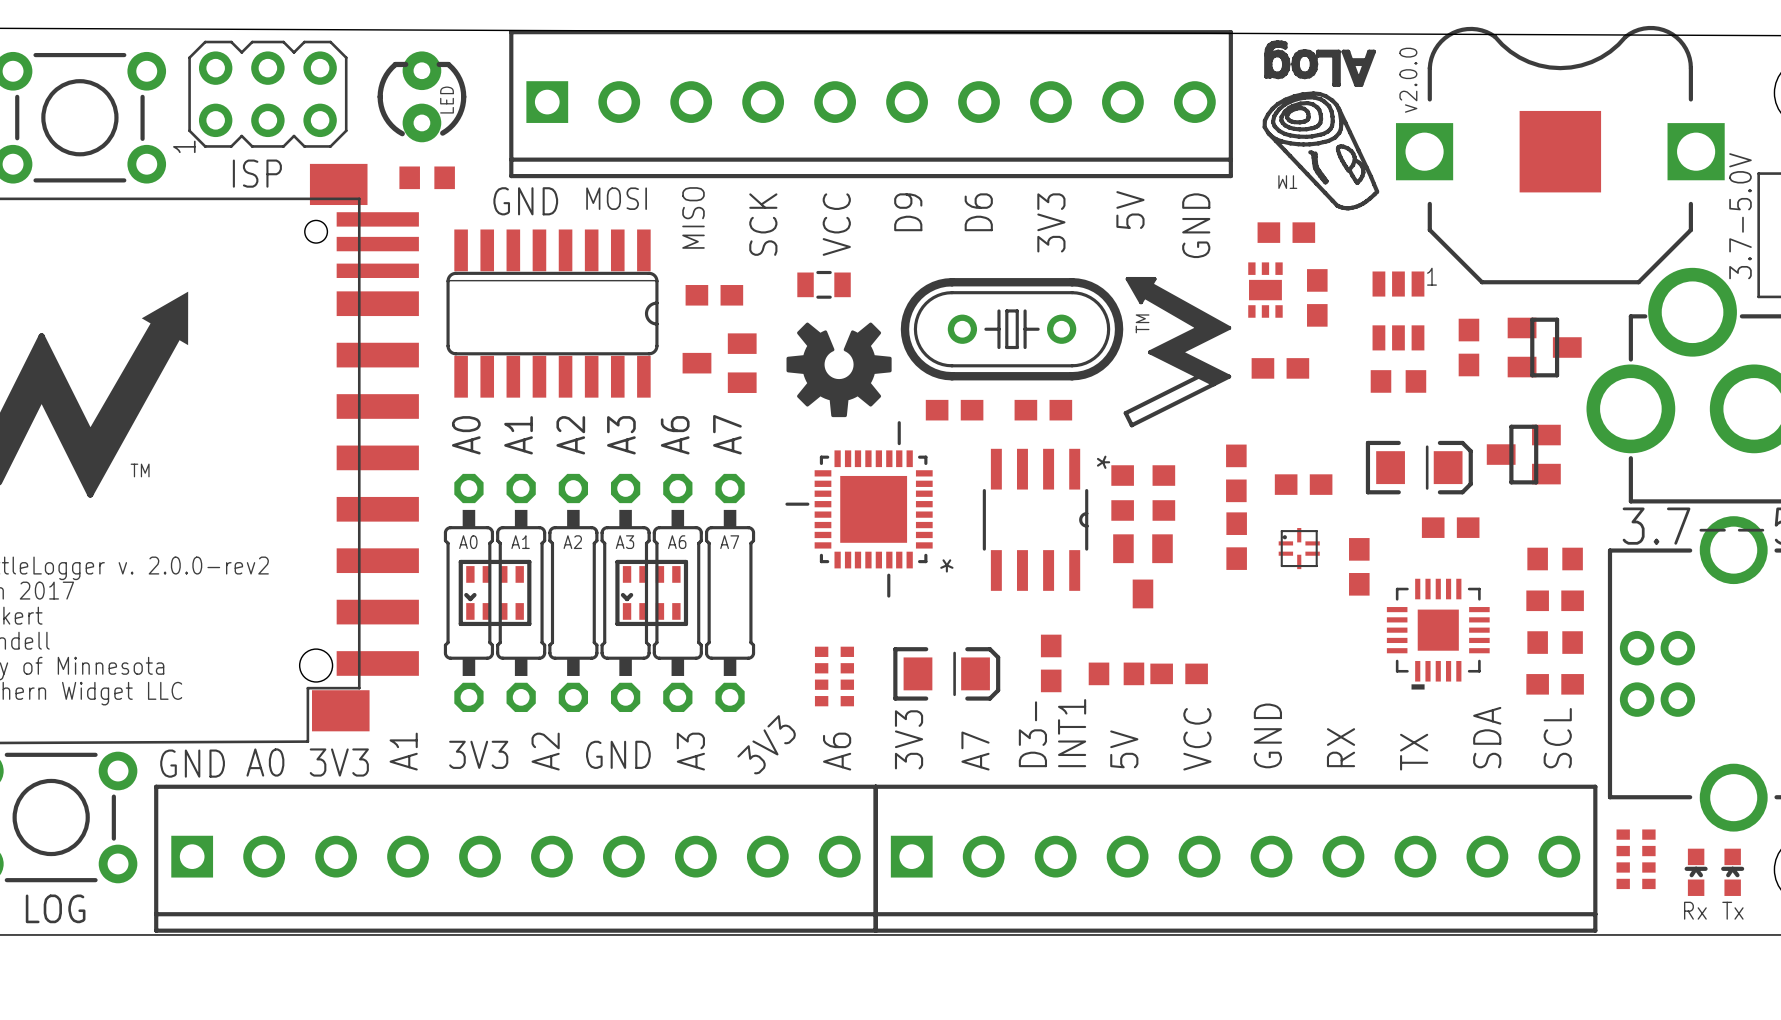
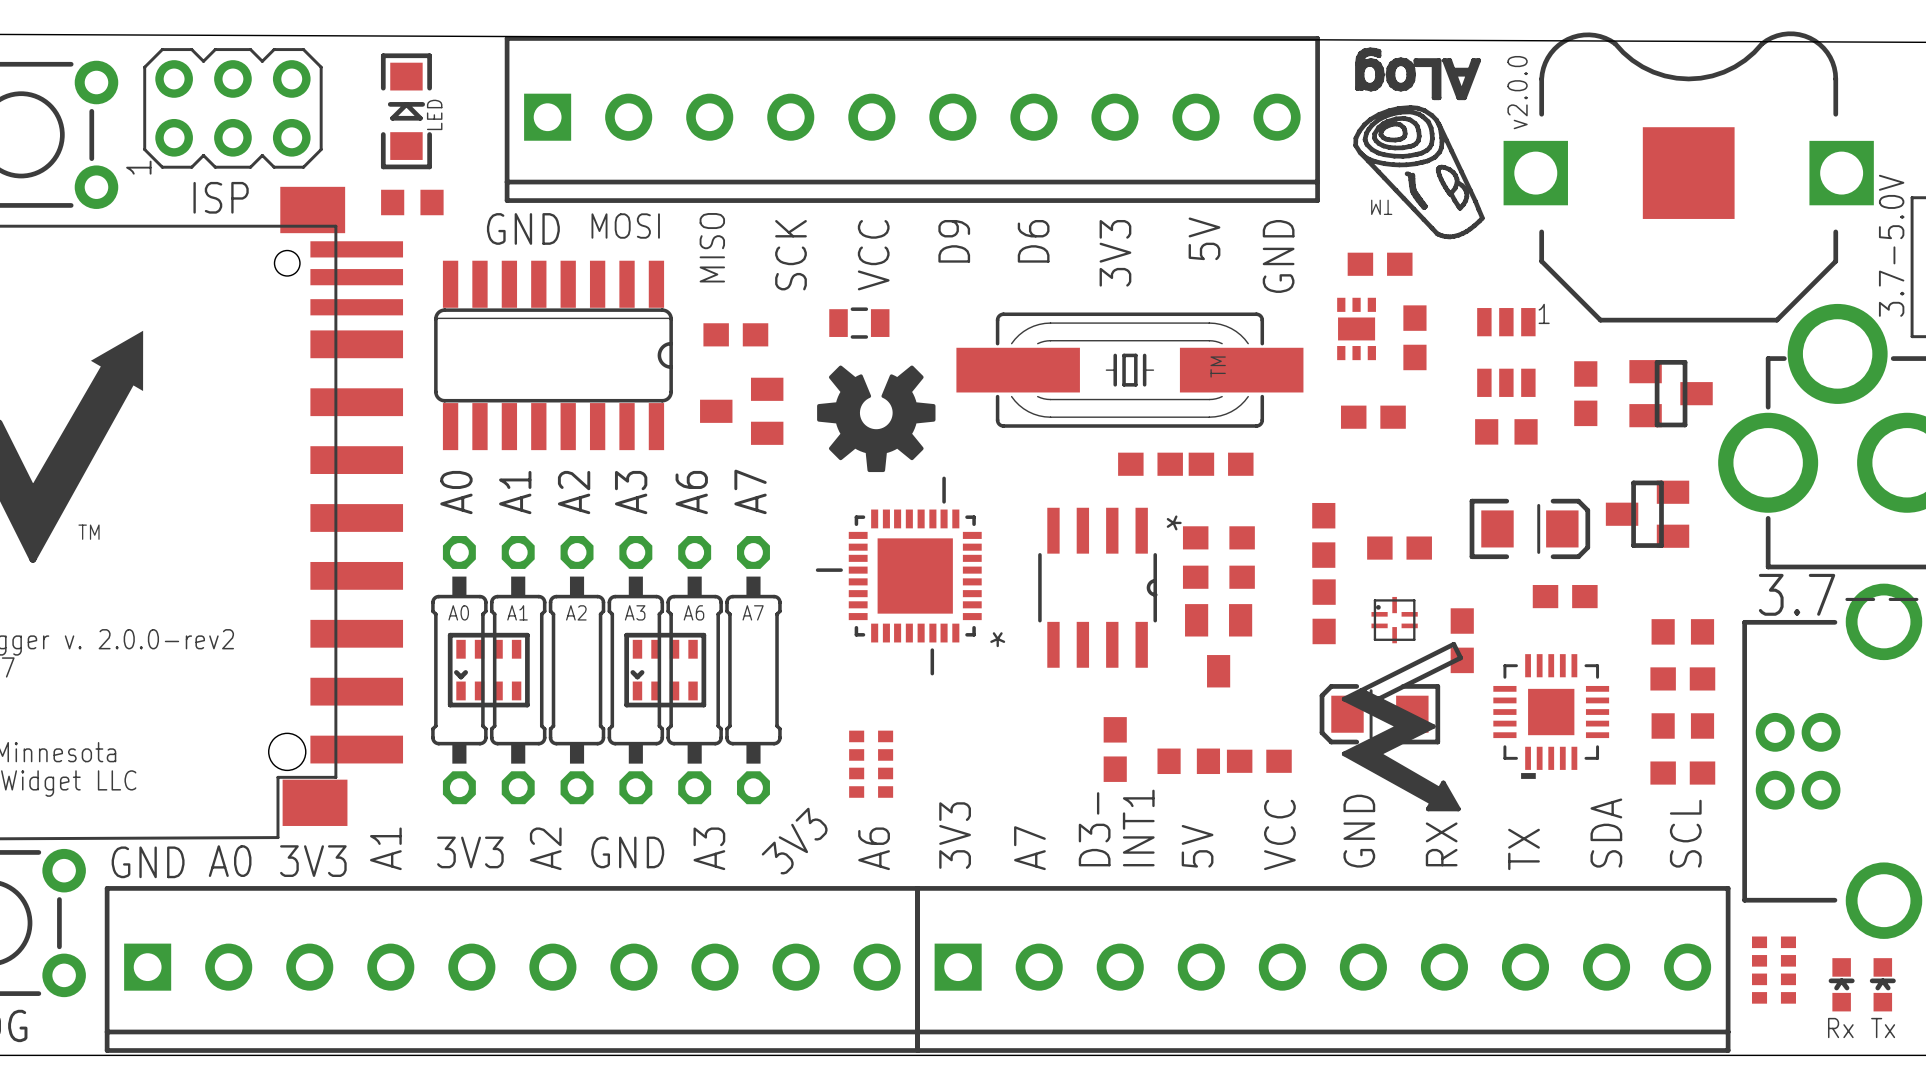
LED footprint: [377, 51, 467, 143] -> [380, 53, 432, 170]
drawing: [1123, 276, 1232, 428] -> none
part: none -> (1129, 370)
part: (1012, 329) -> none
part: (954, 410) -> none
part position: (1043, 410) -> (1150, 464)
part: none -> (1221, 464)
drawing: none -> [1341, 641, 1463, 812]
part rotation: 0° (946, 673) -> 180° (1379, 714)
part position: (946, 673) -> (1379, 714)

